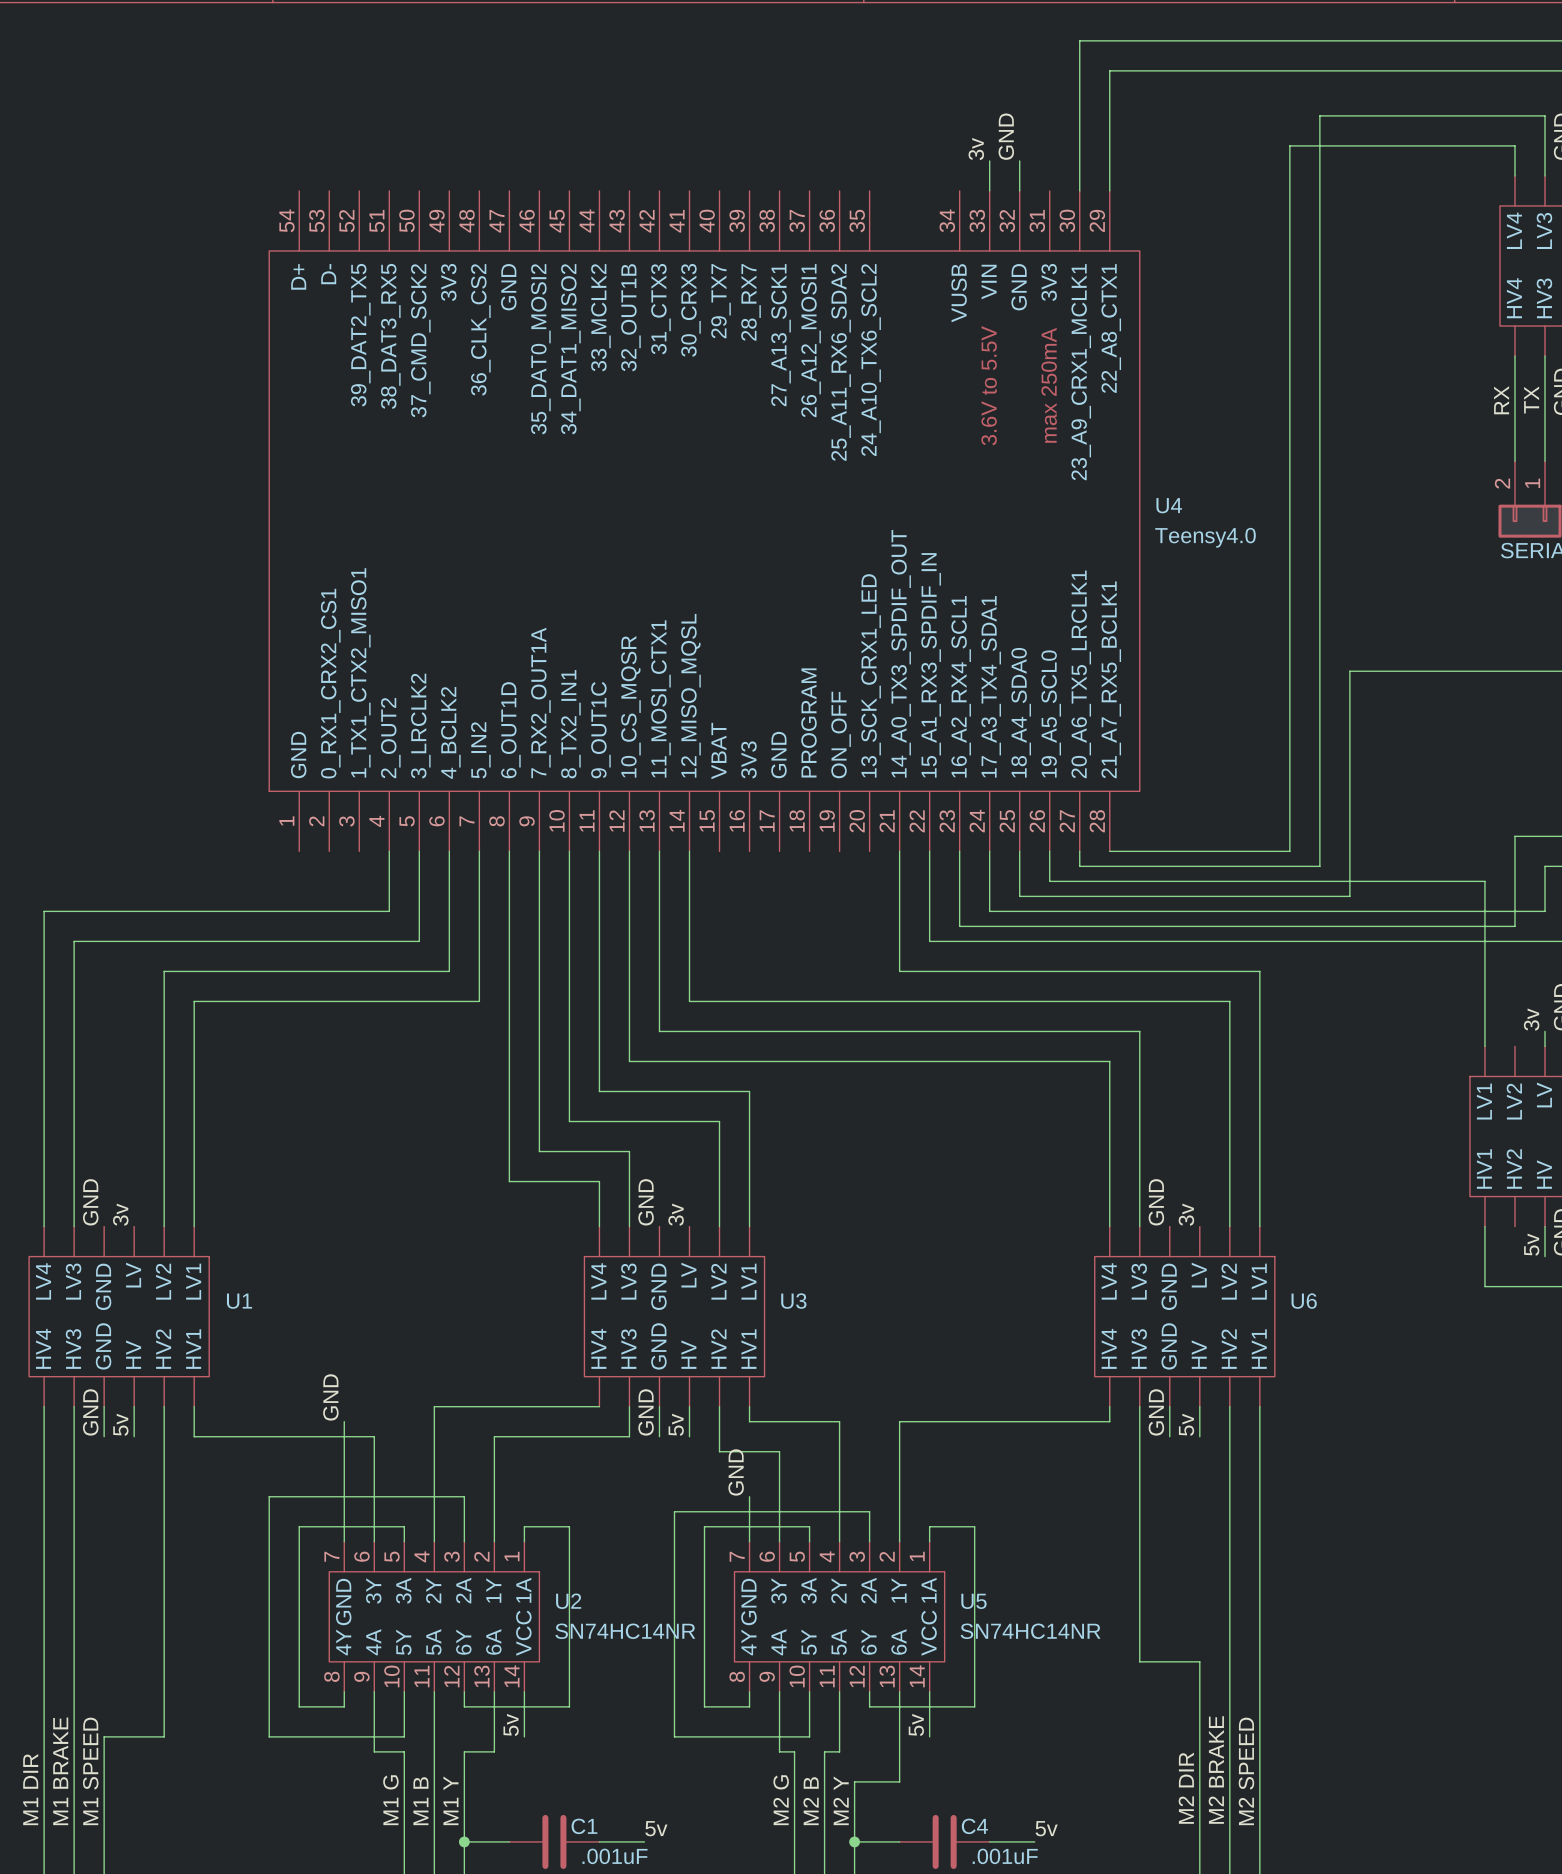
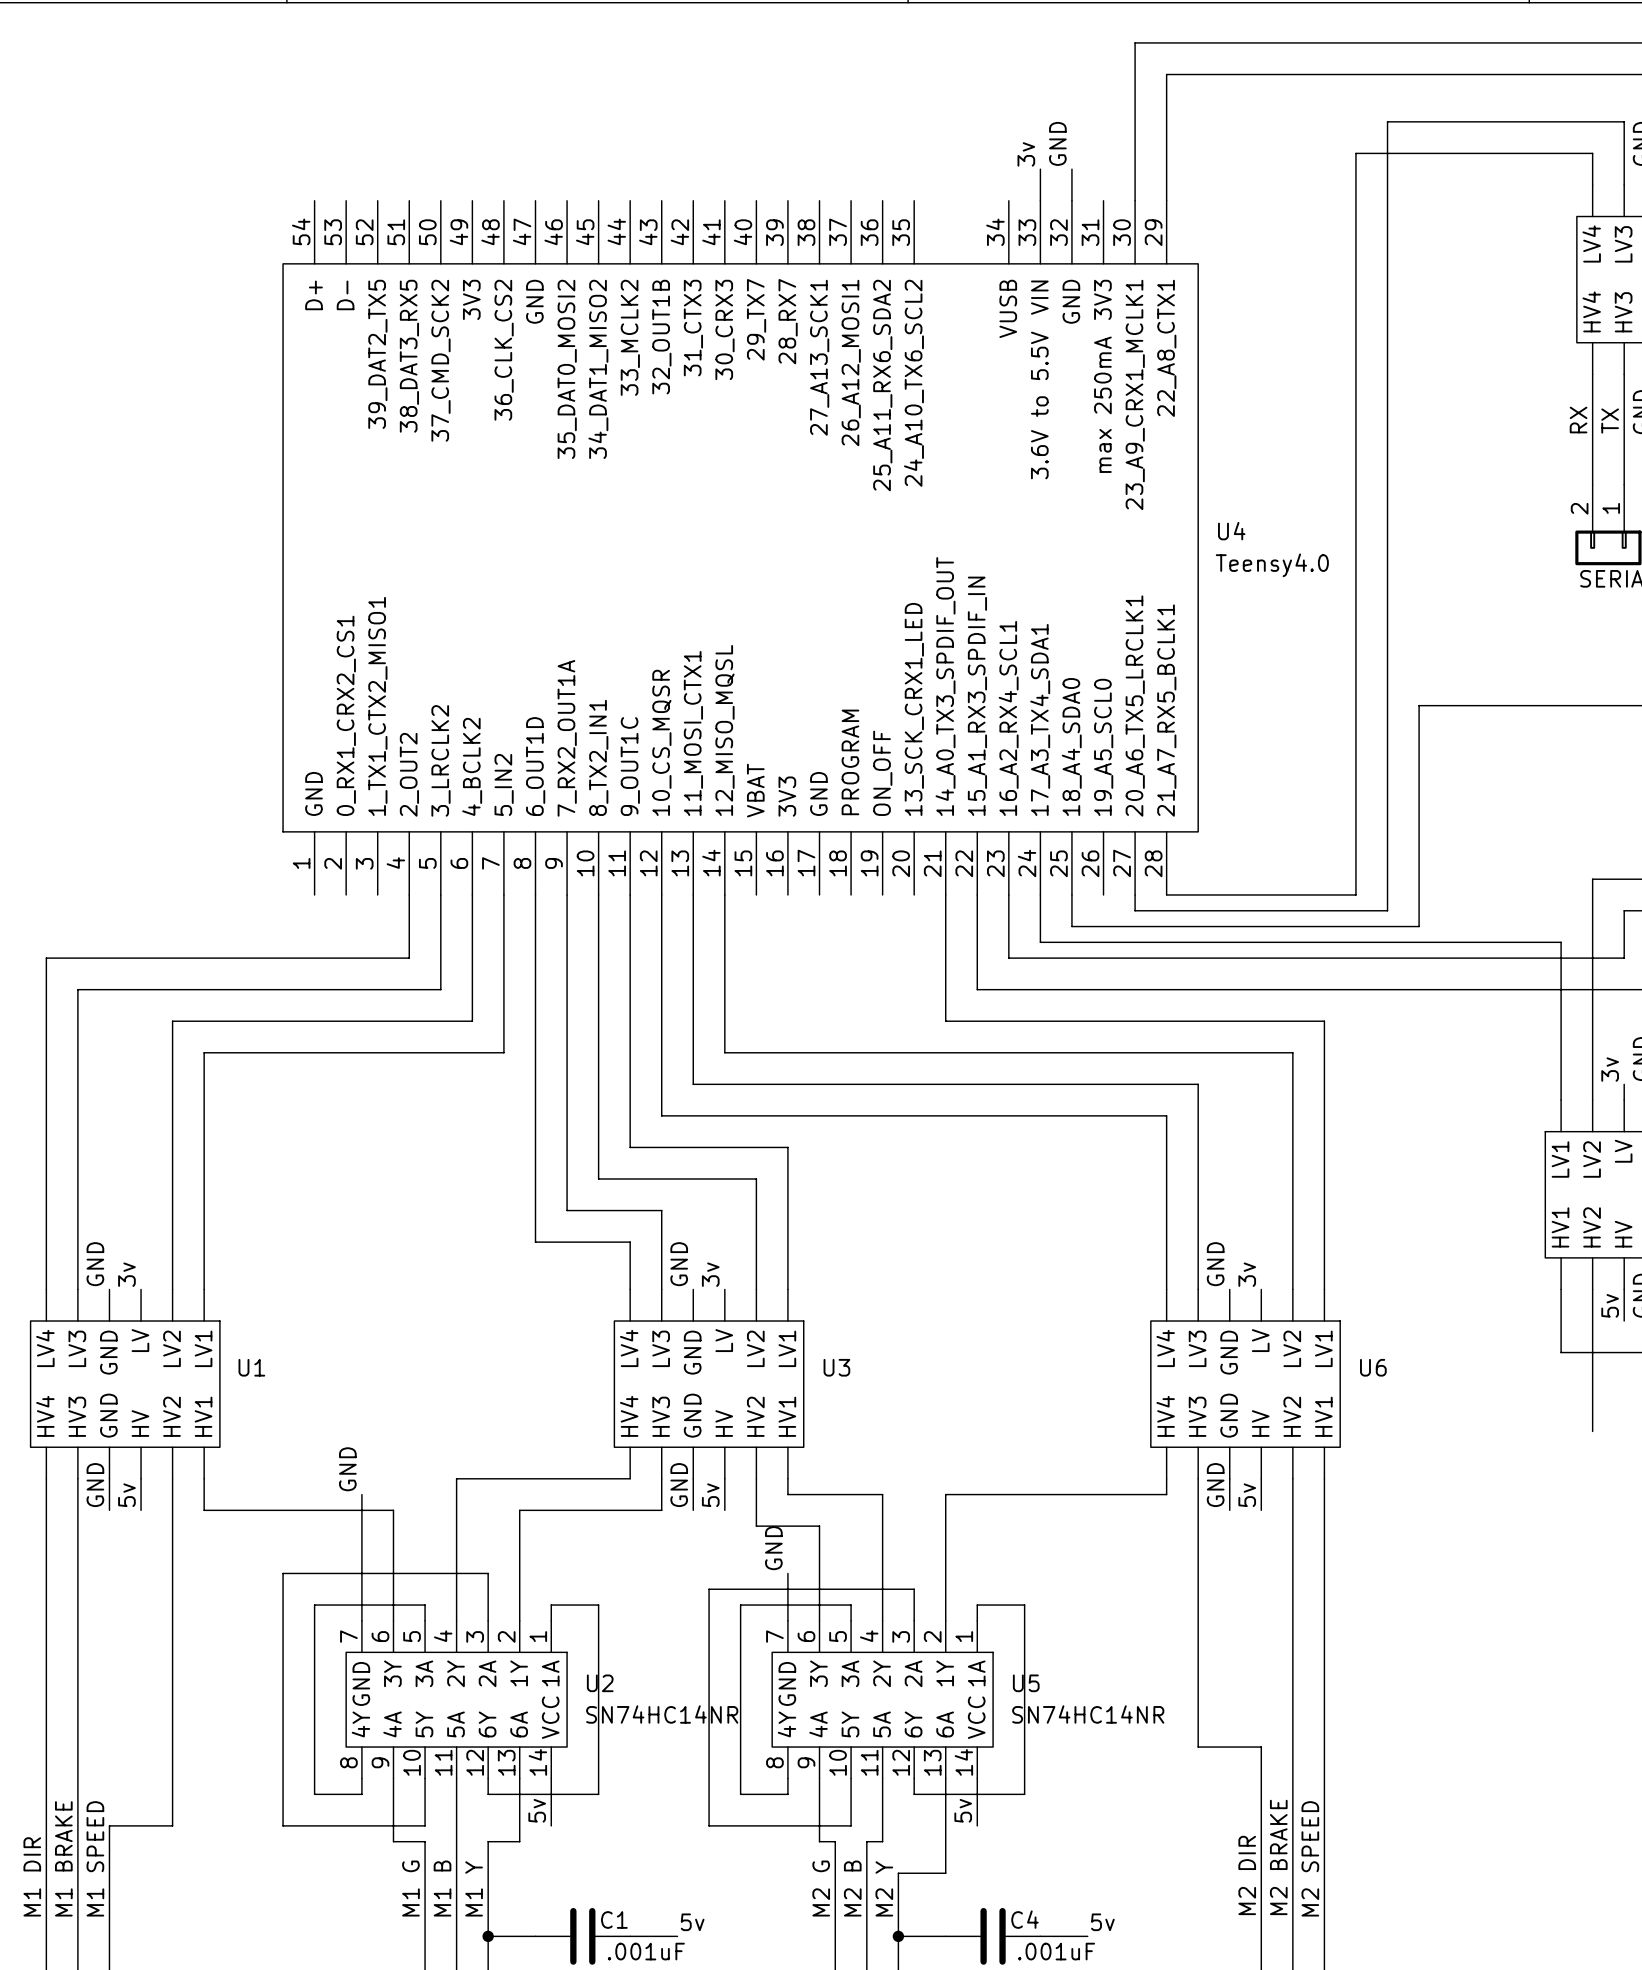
wire: (1049, 851) (1049, 881) -> (1071, 926) (1103, 926)
wire: (1019, 881) (1019, 896) -> (1040, 942) (1071, 942)
wire: (989, 896) (989, 911) -> (1008, 958) (1040, 958)
wire: (1349, 896) (1349, 881) (1484, 881) (1484, 896) -> (1419, 942) (1561, 942)
wire: (959, 911) (959, 926) (1514, 926) -> (1592, 1100) (1592, 973)
wire: none -> (1592, 1289) (1592, 1431)

